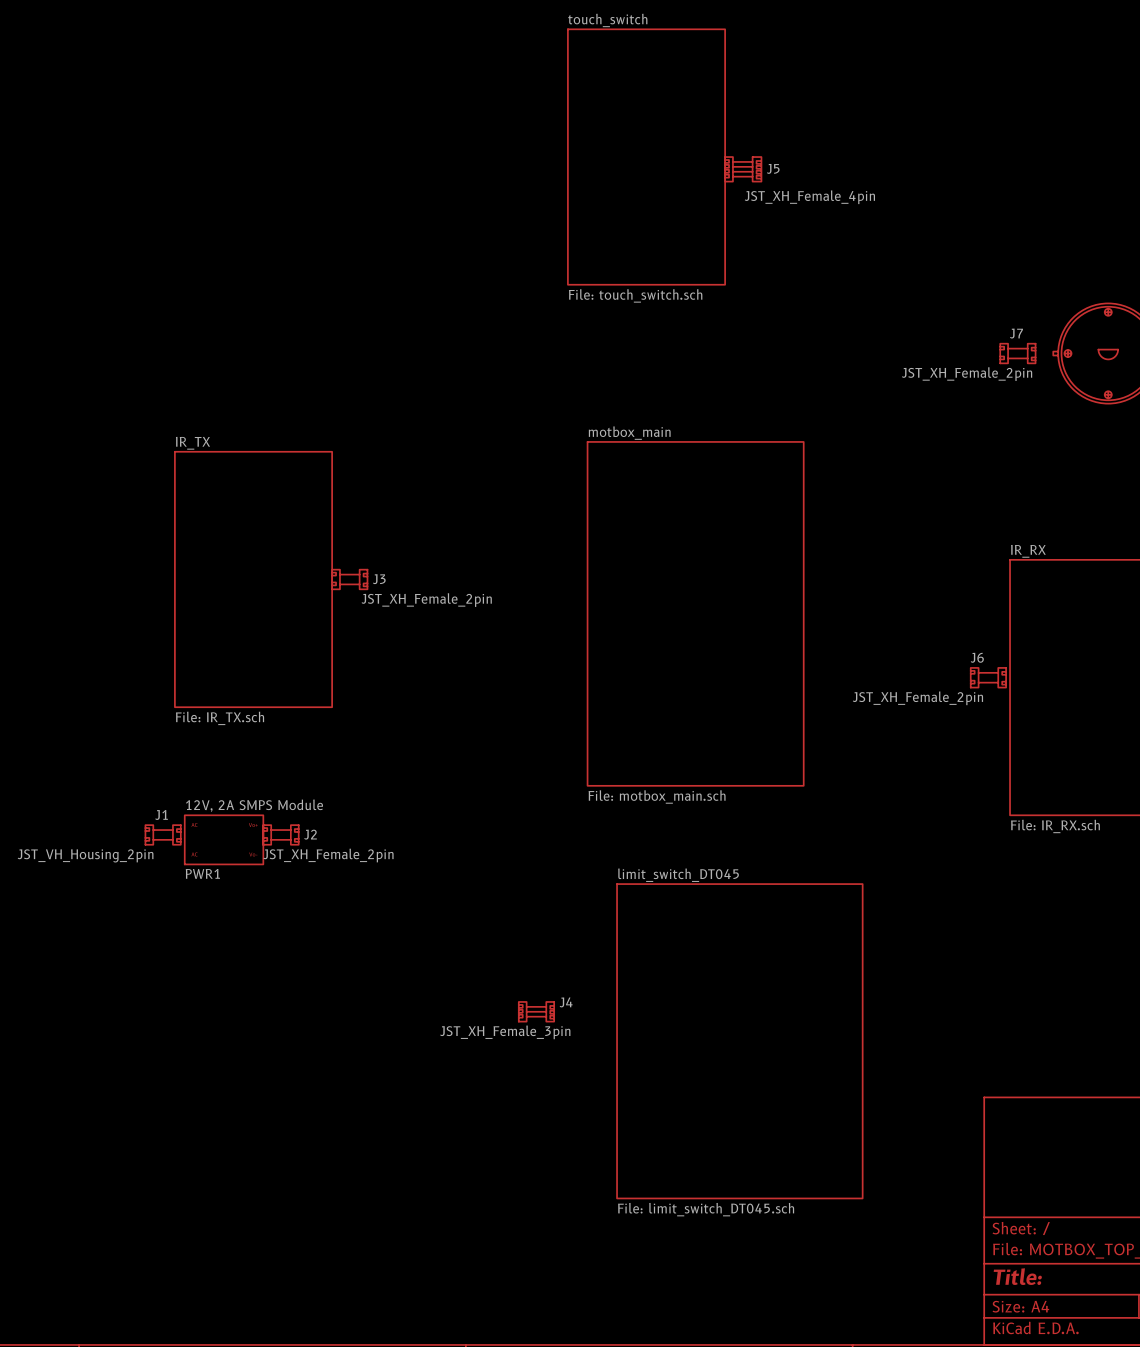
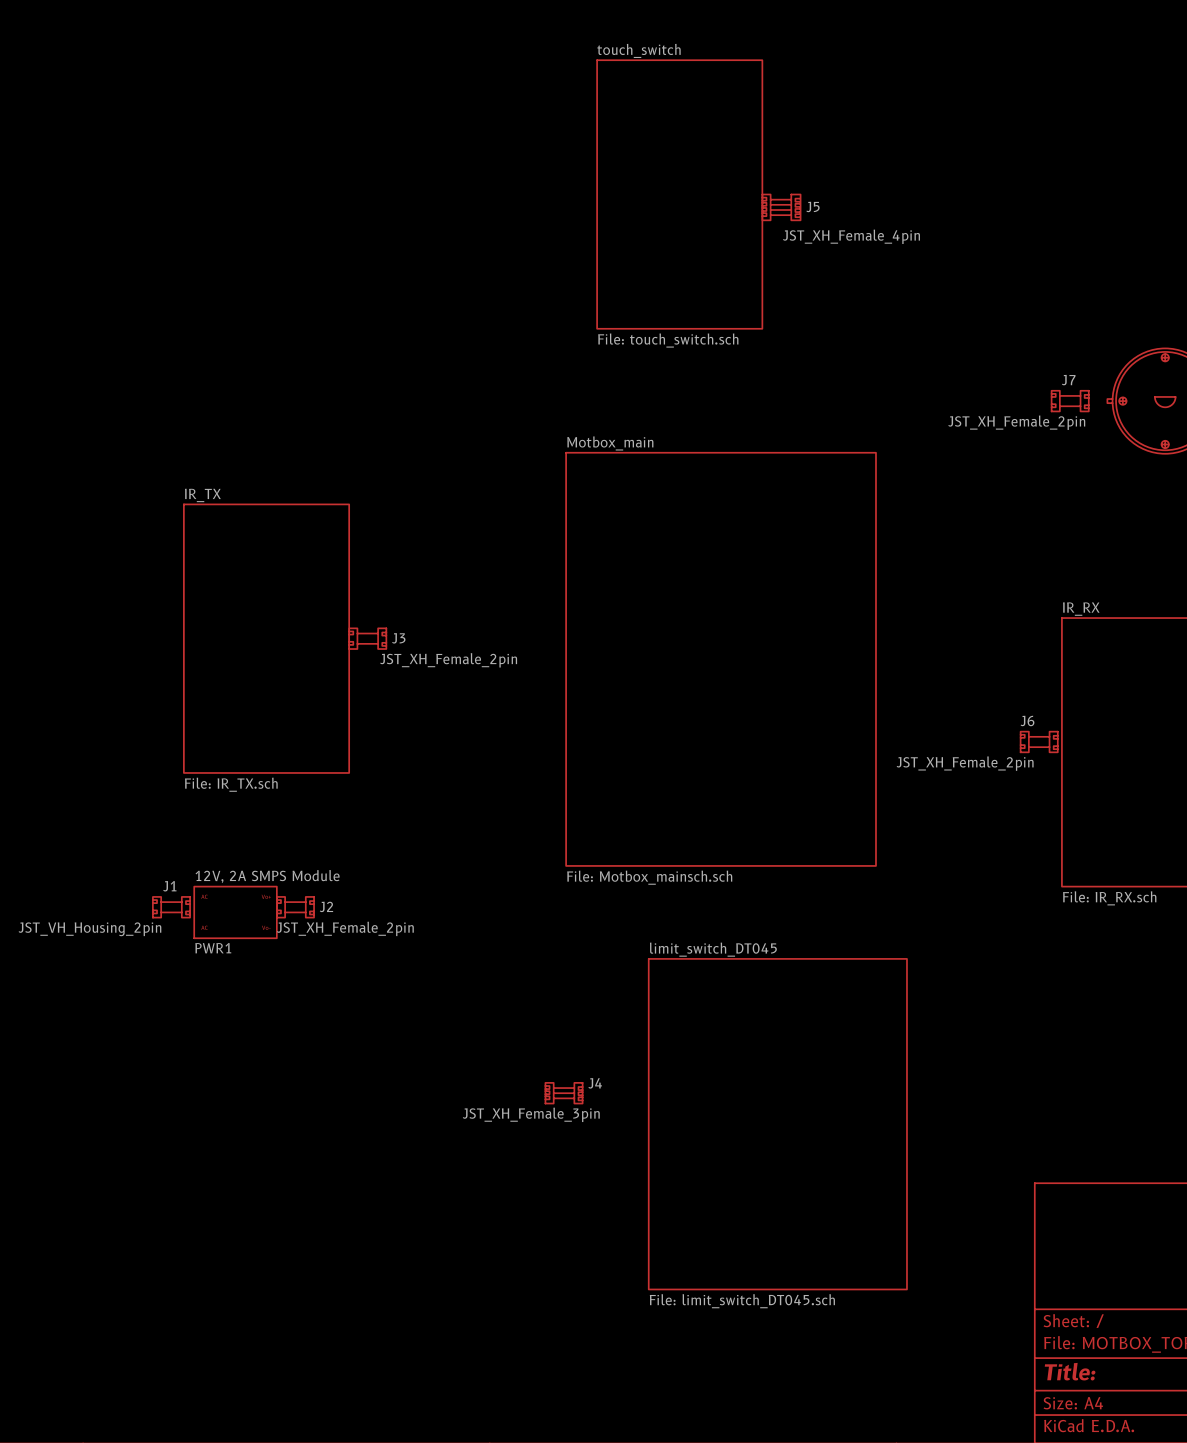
sheet Motbox_main: none -> File: Motbox_mainsch.sch (721, 659)
sheet motbox_main: File: motbox_main.sch (695, 613) -> none

